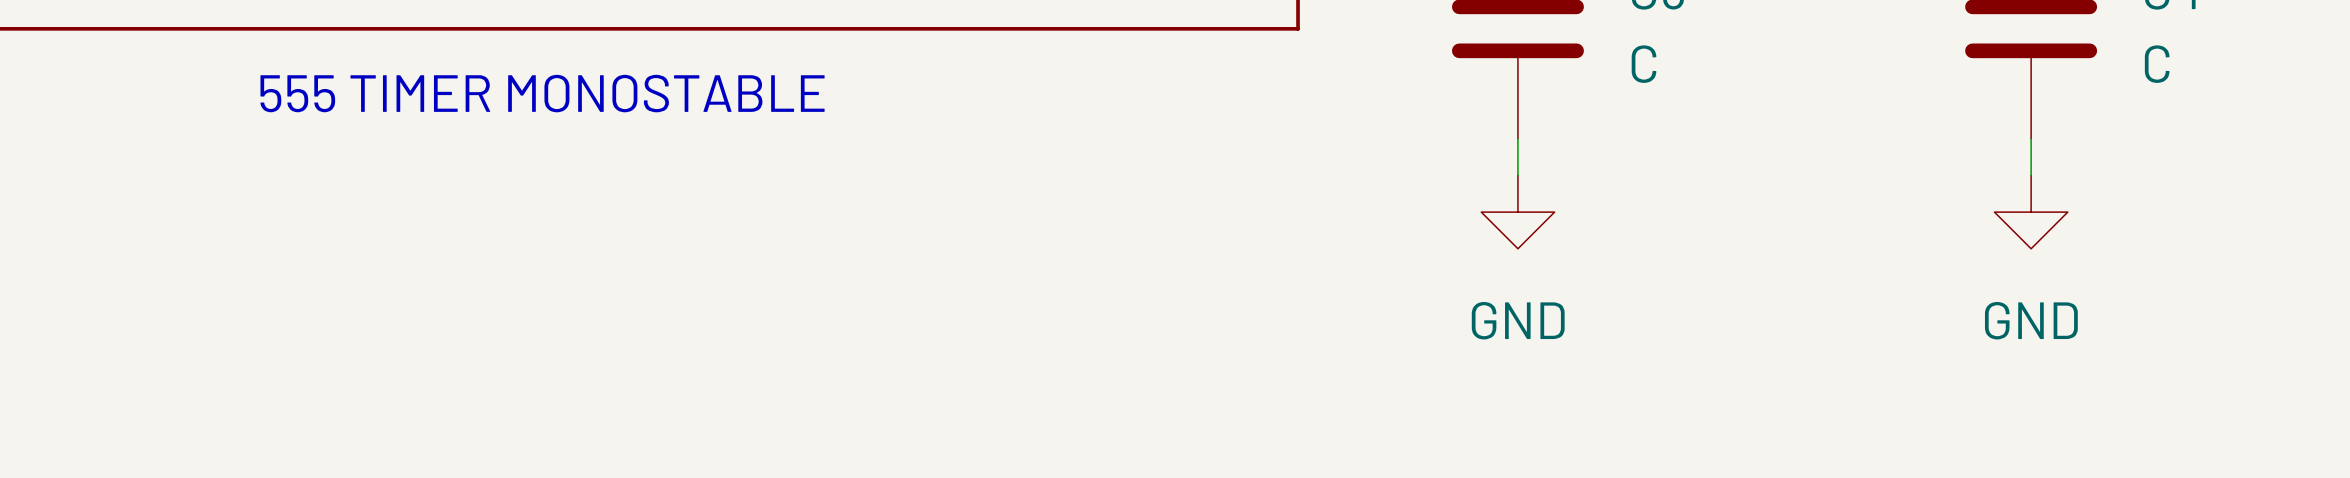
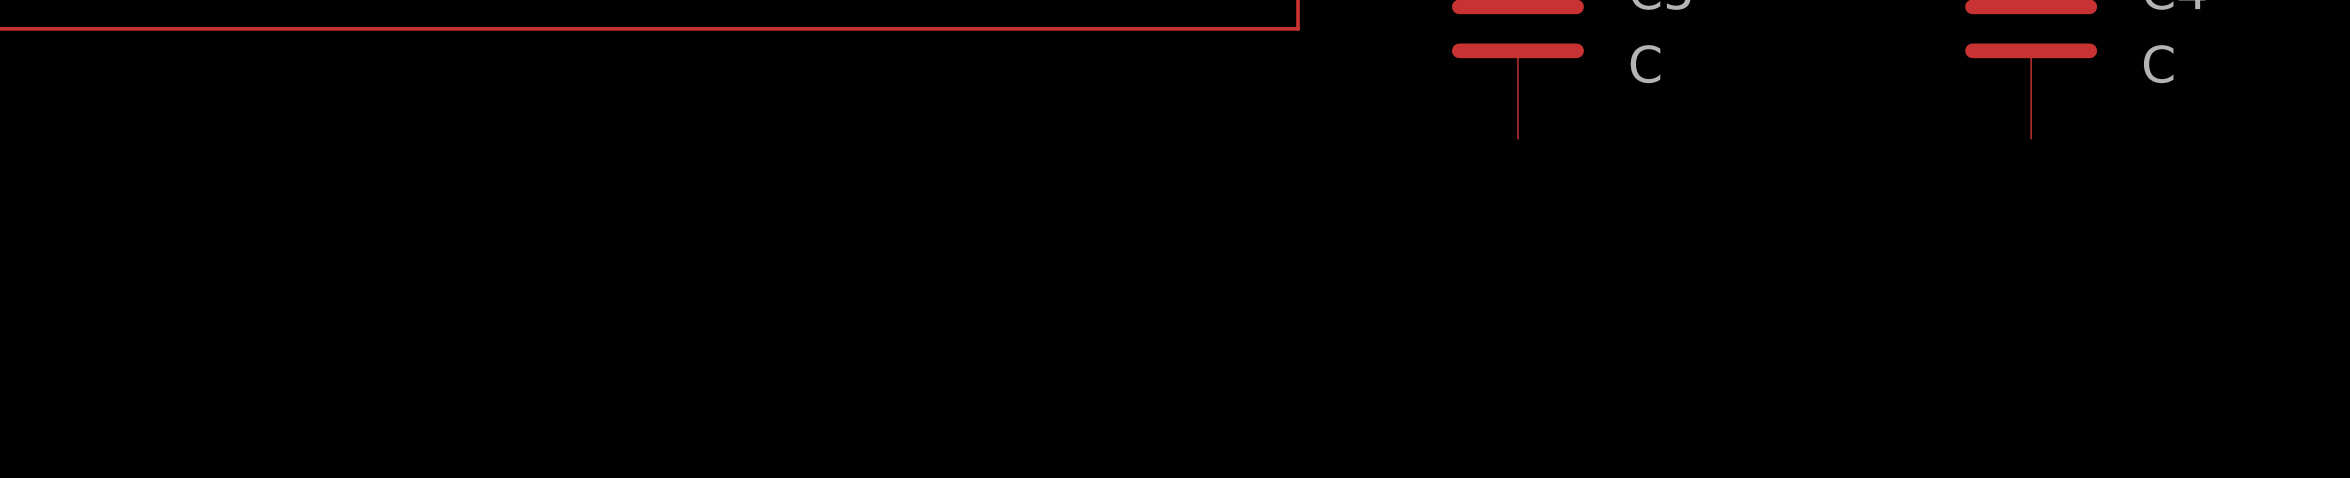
text: 555 TIMER MONOSTABLE (542, 93) -> none
wire: (1517, 138) (1517, 175) -> none
wire: (2031, 138) (2031, 175) -> none
power symbol: GND (1517, 212) -> none
power symbol: GND (2031, 212) -> none

